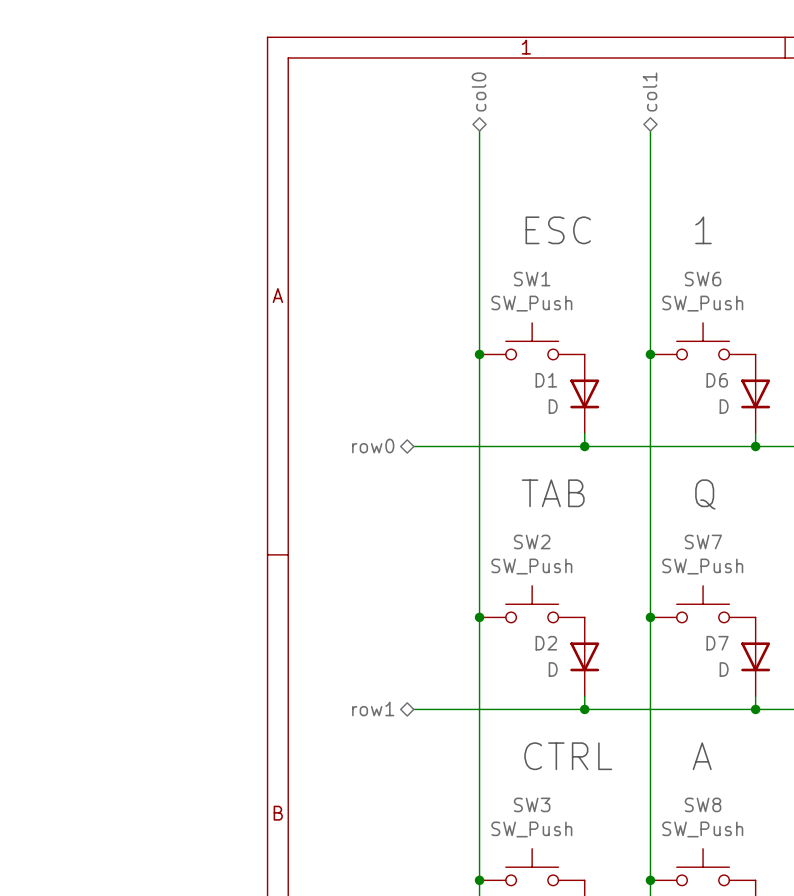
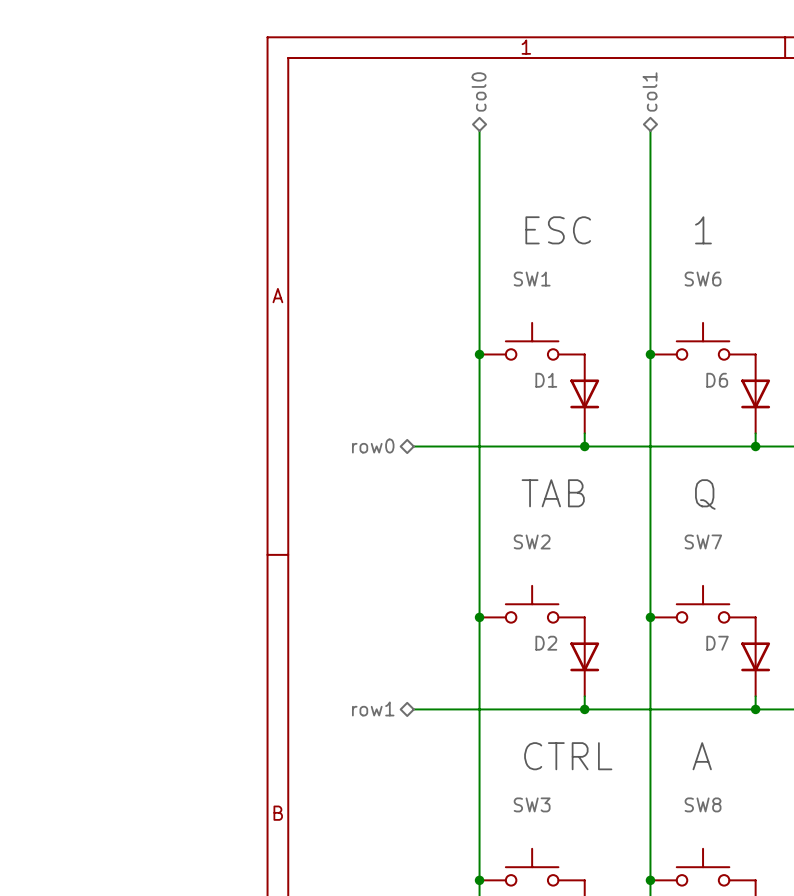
SW1 value: SW_Push (531, 303) -> none
SW6 value: SW_Push (702, 303) -> none
D1 value: D (553, 406) -> none
D6 value: D (724, 406) -> none
SW2 value: SW_Push (531, 566) -> none
SW7 value: SW_Push (702, 566) -> none
D2 value: D (553, 669) -> none
D7 value: D (724, 669) -> none
SW3 value: SW_Push (531, 829) -> none
SW8 value: SW_Push (702, 829) -> none

